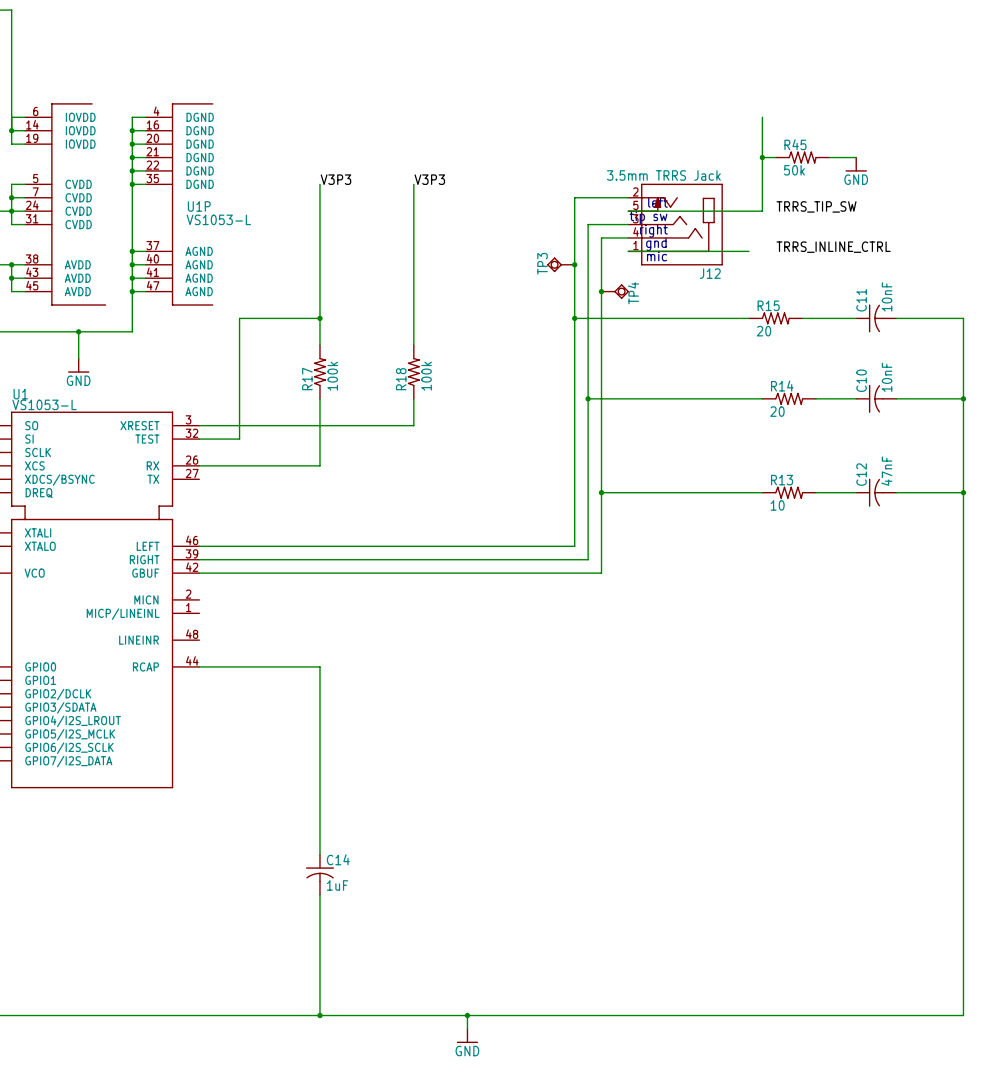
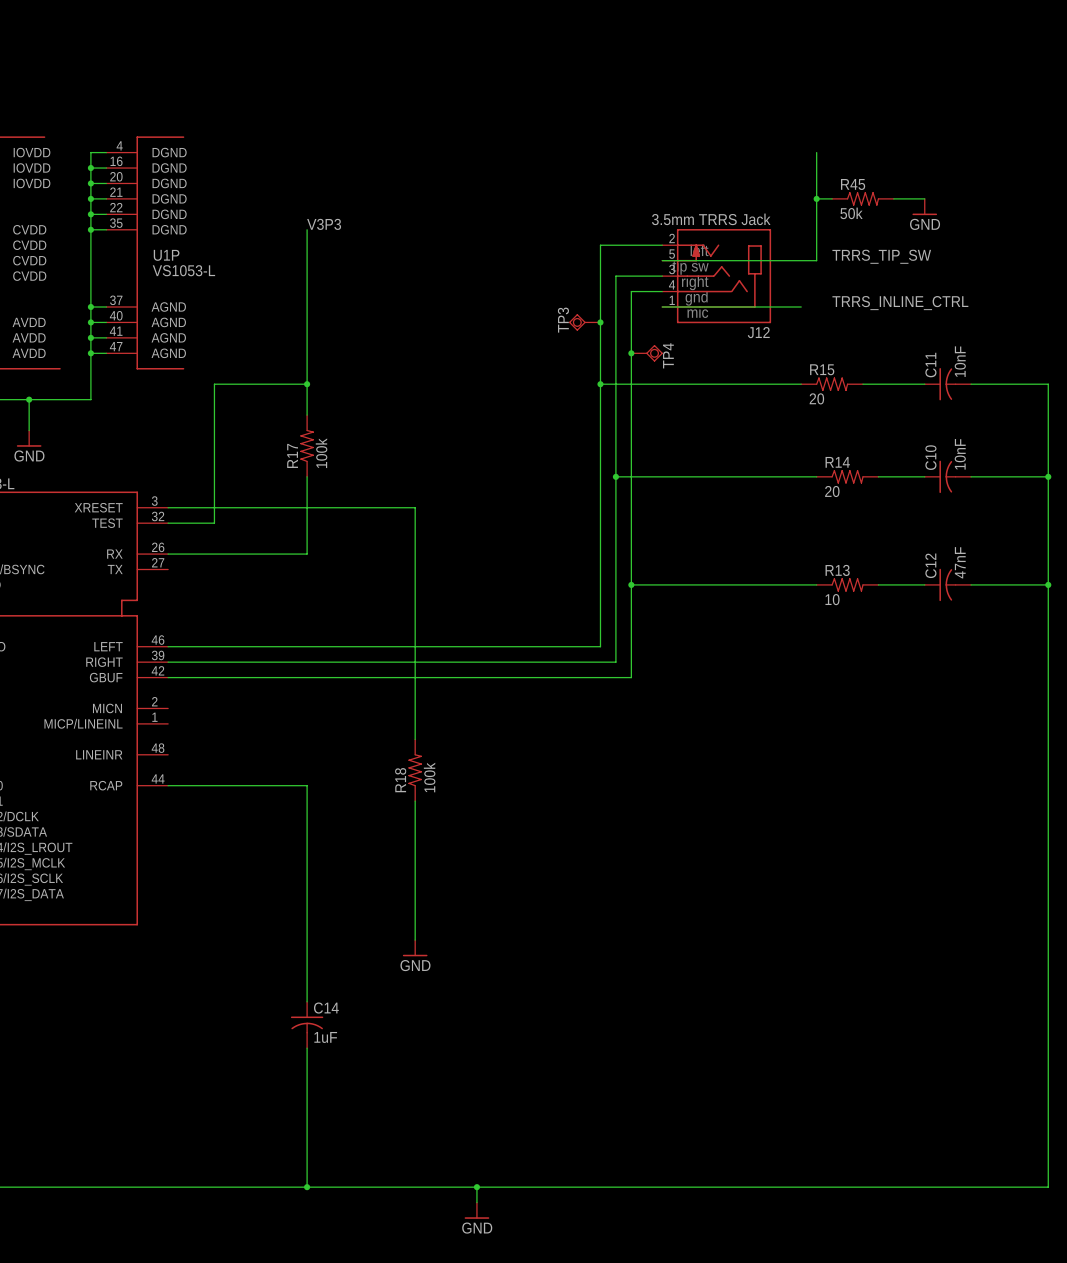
label: V3P3 (429, 179) -> none
wire: (413, 184) (413, 345) -> none
R18 position: (413, 372) -> (415, 770)
wire: (413, 398) (413, 425) -> (415, 739) (415, 507)
wire: none -> (415, 801) (415, 940)
power symbol: none -> GND (415, 948)

